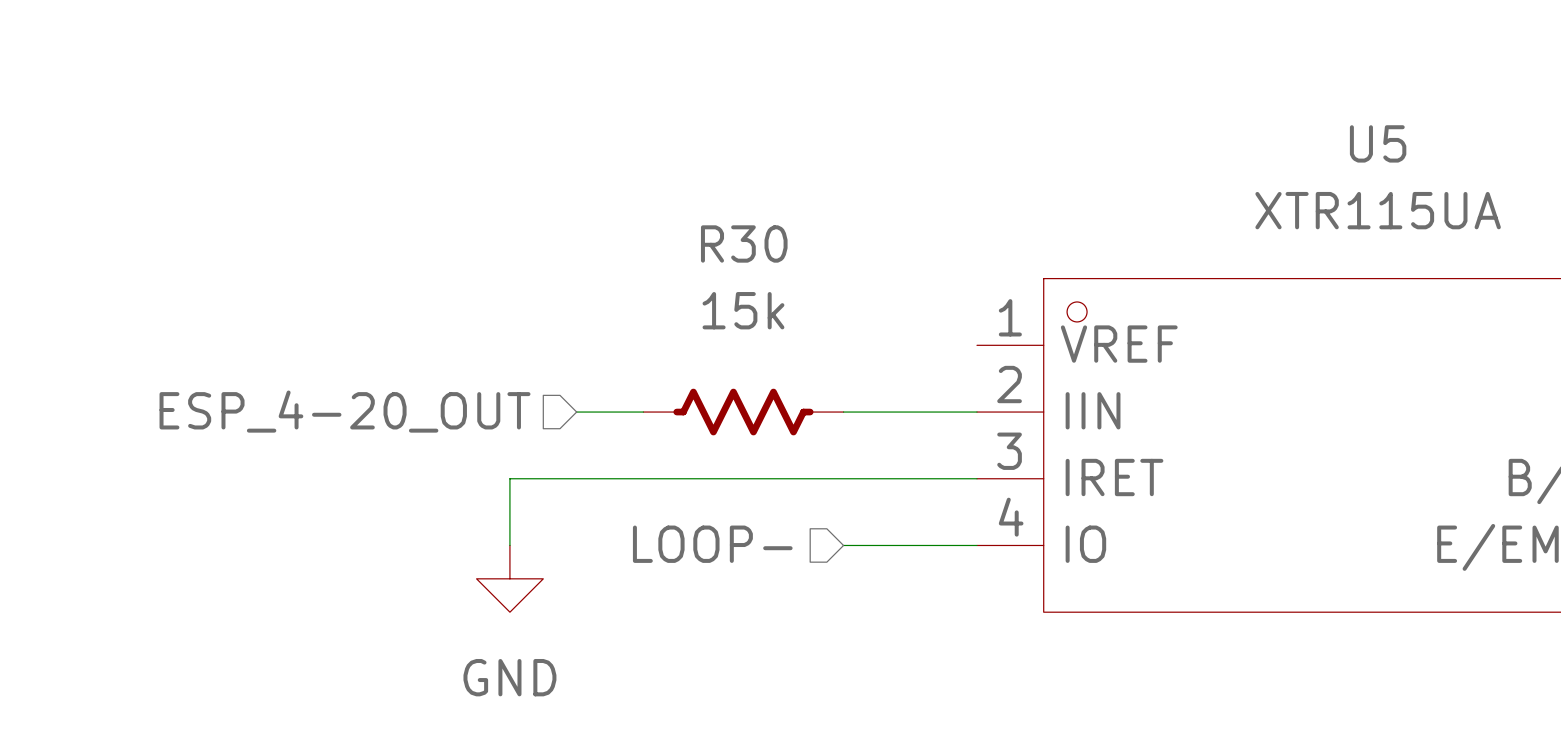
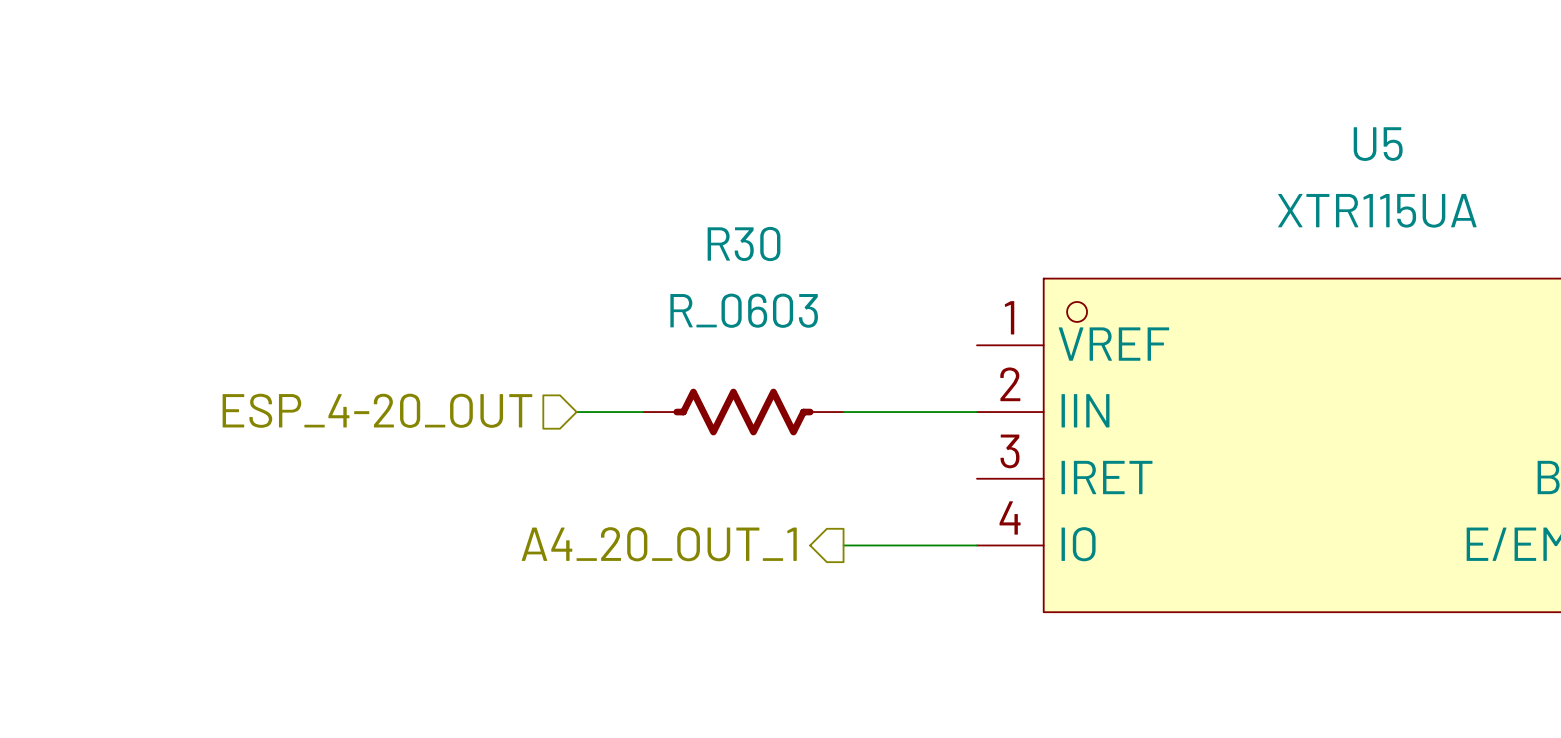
R30 value: 15k (743, 310) -> R_0603 (744, 310)
wire: (976, 478) (509, 478) (509, 545) -> none
hierarchical label shape: input (712, 544) -> output (659, 544)
hierarchical label: LOOP- (712, 544) -> A4_20_OUT_1 (659, 544)
power symbol: GND (509, 578) -> none

